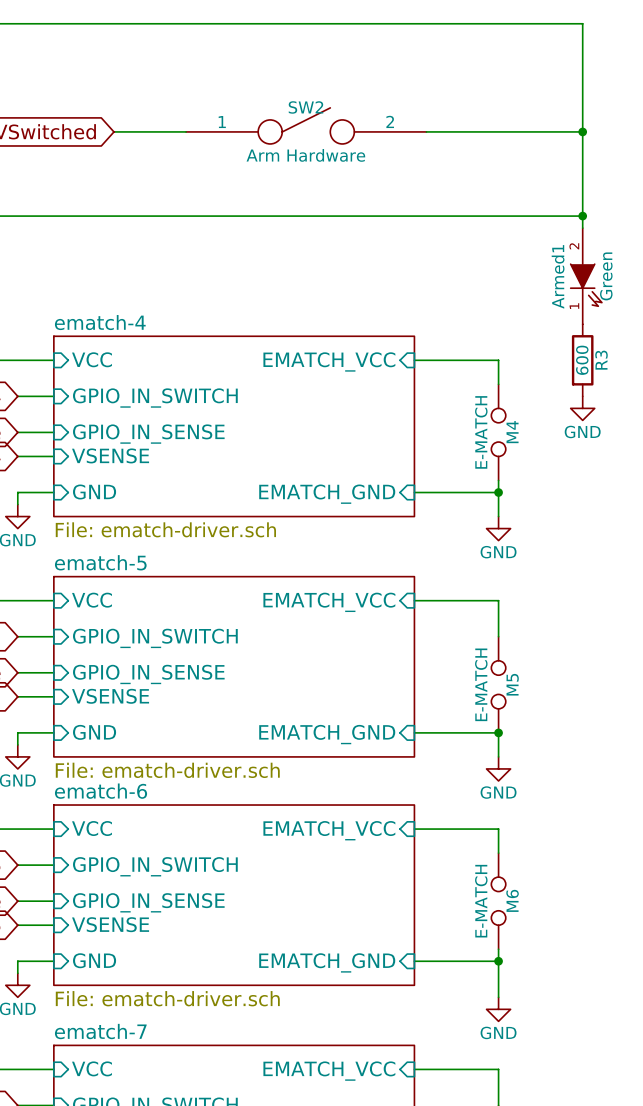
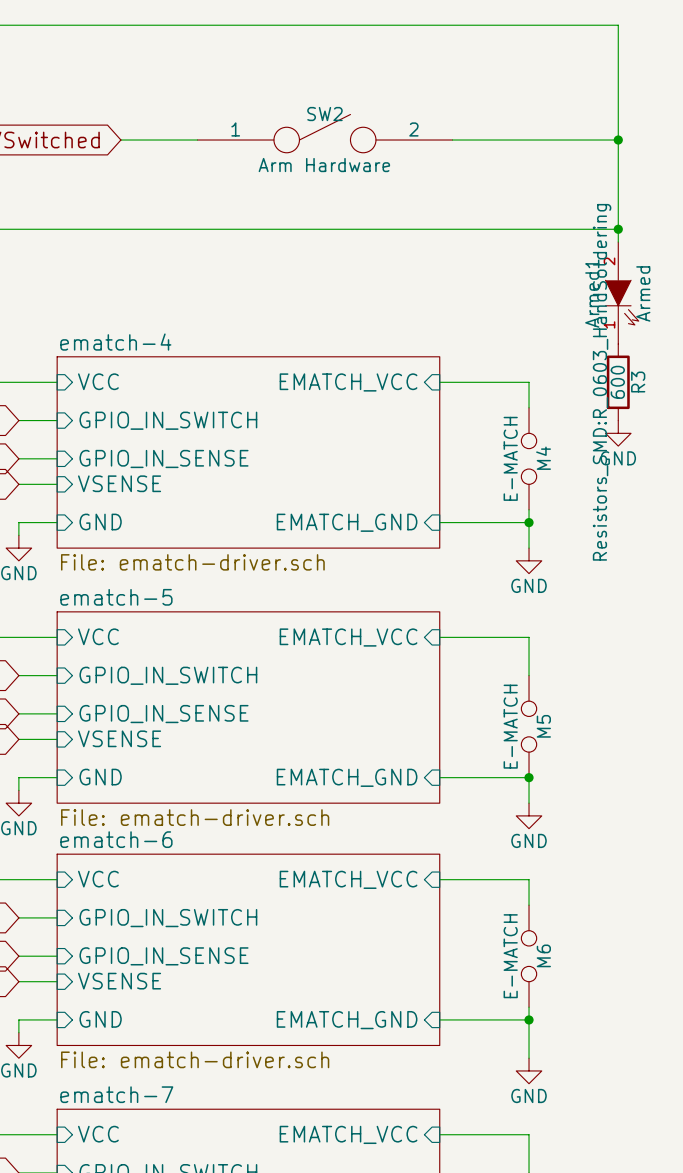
Armed1 value: Green (606, 276) -> Armed (643, 293)
R3 text: none -> Resistors_SMD:R_0603_HandSoldering (602, 382)

